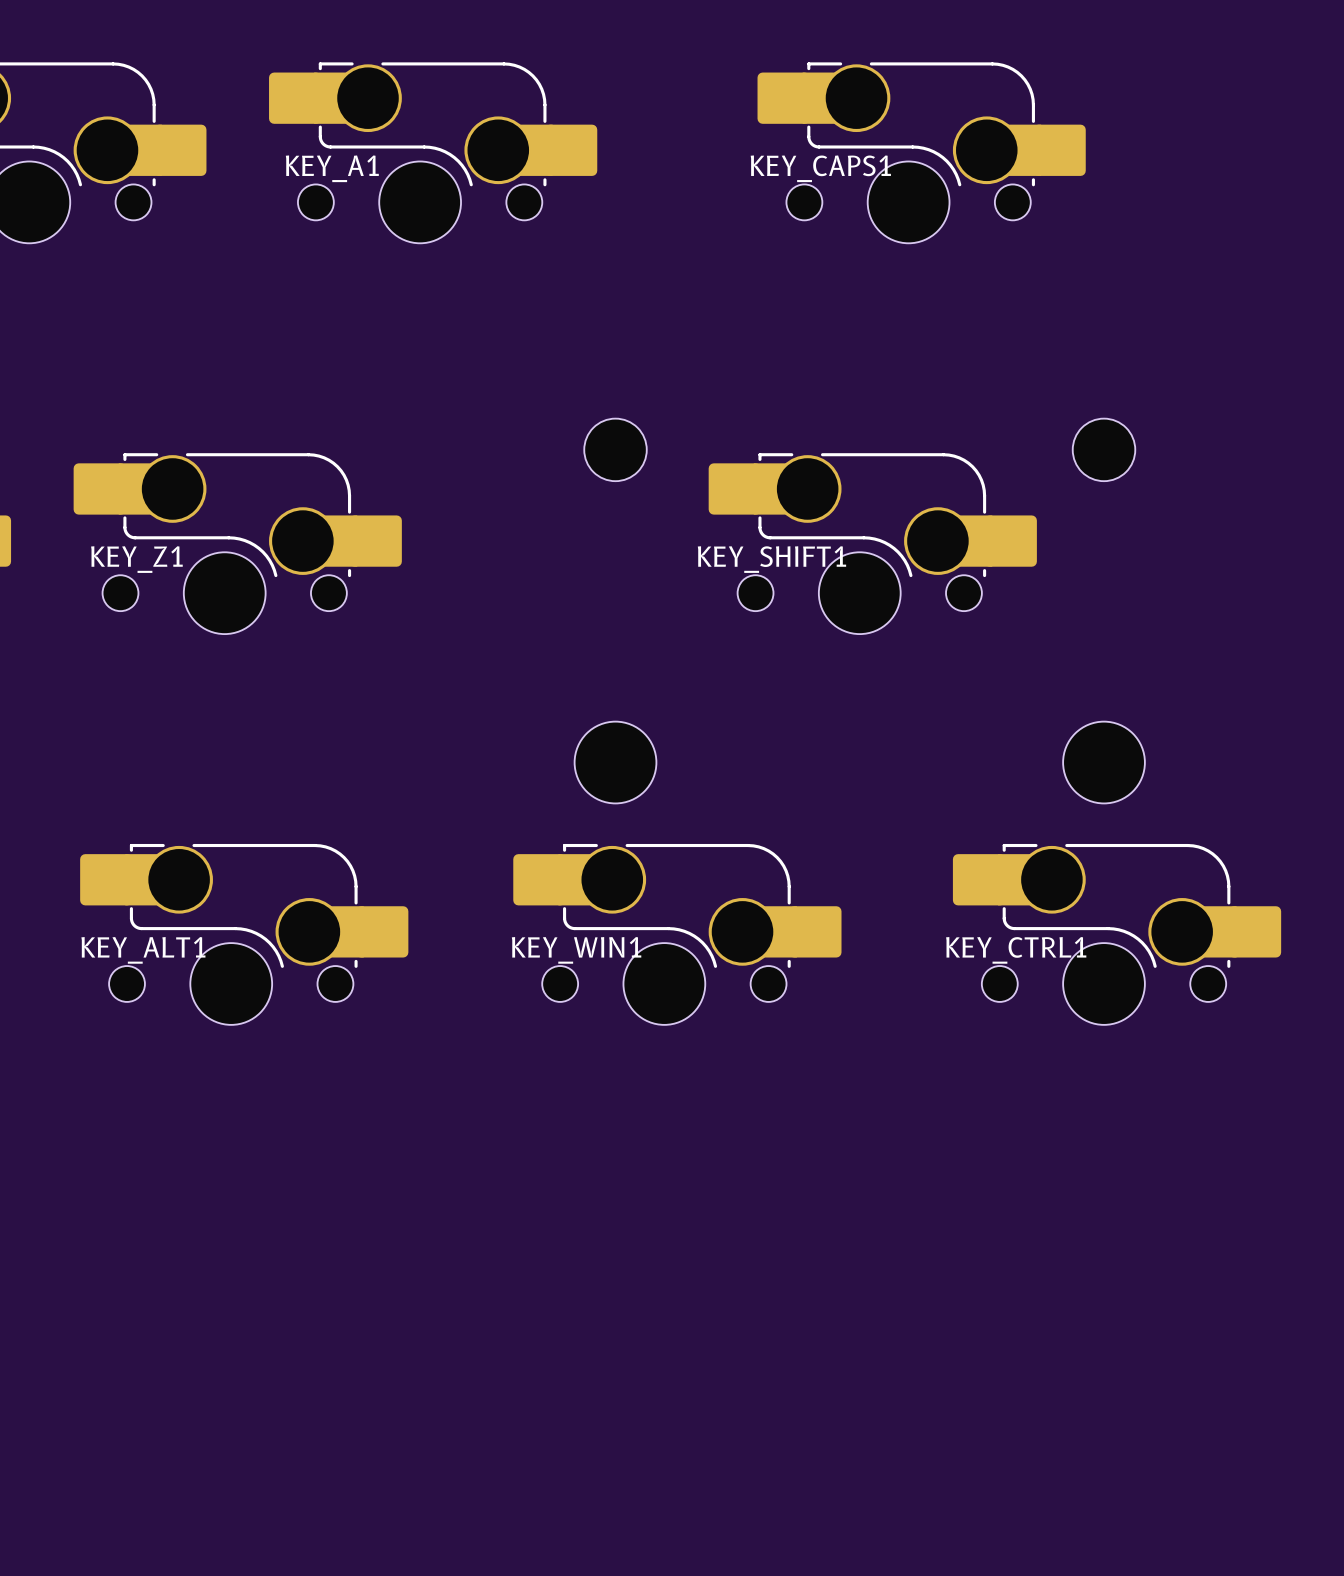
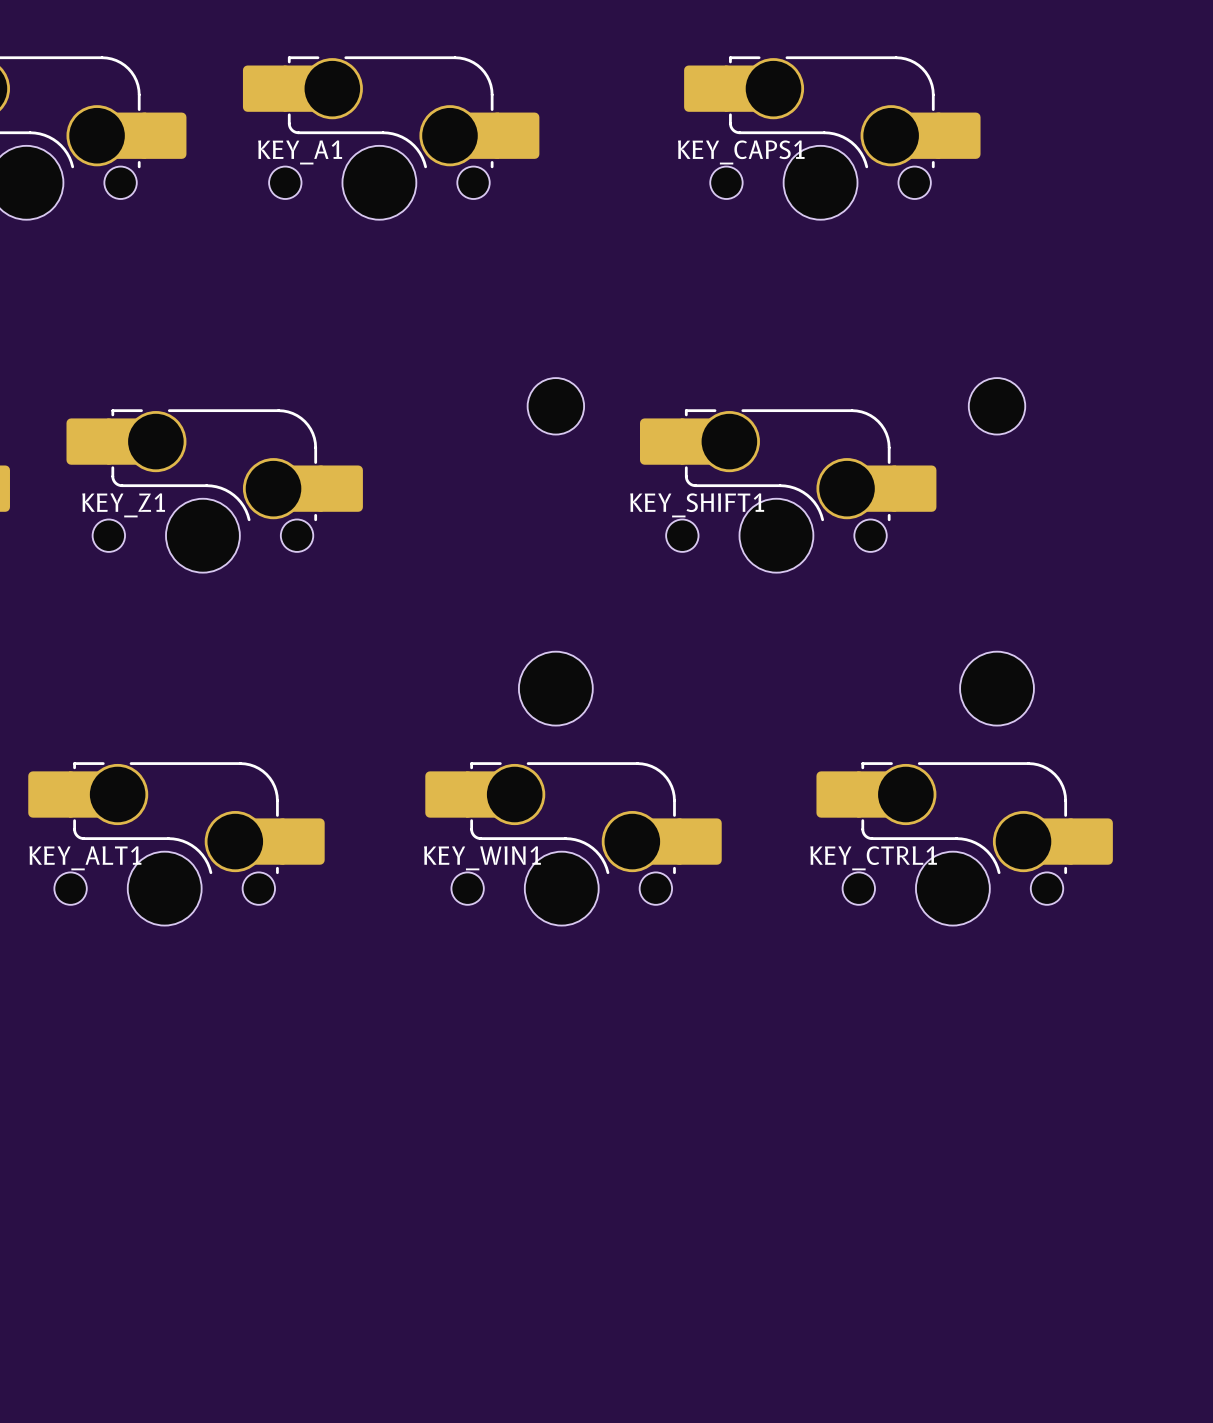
KEY_ALT1 position: (244, 934) -> (176, 843)
KEY_WIN1 position: (677, 934) -> (573, 843)
KEY_CTRL1 position: (1117, 934) -> (964, 843)

